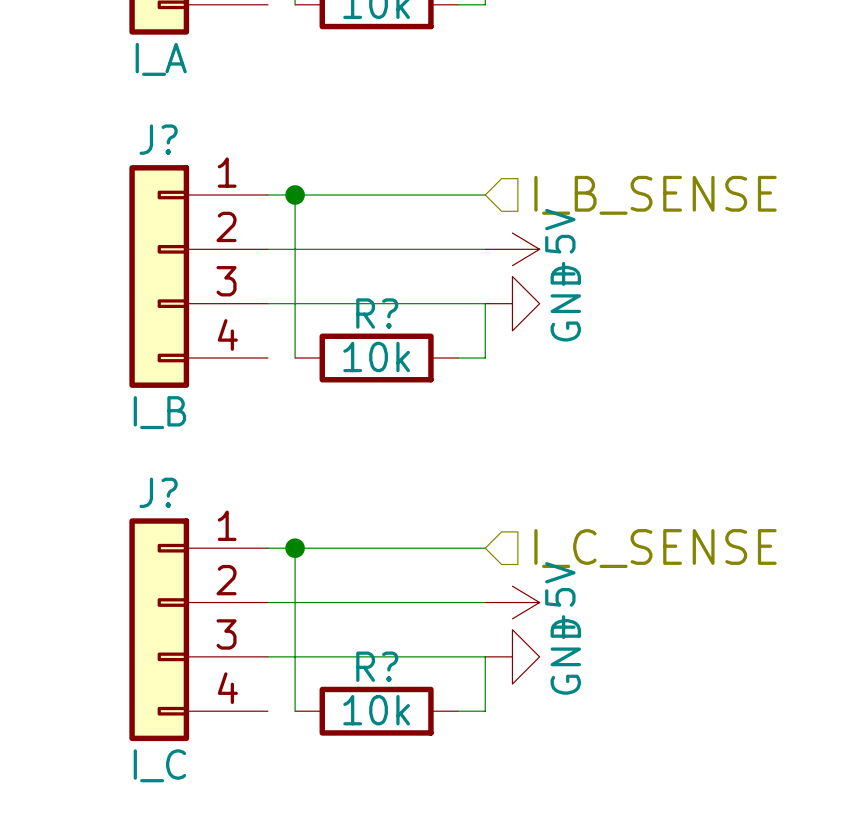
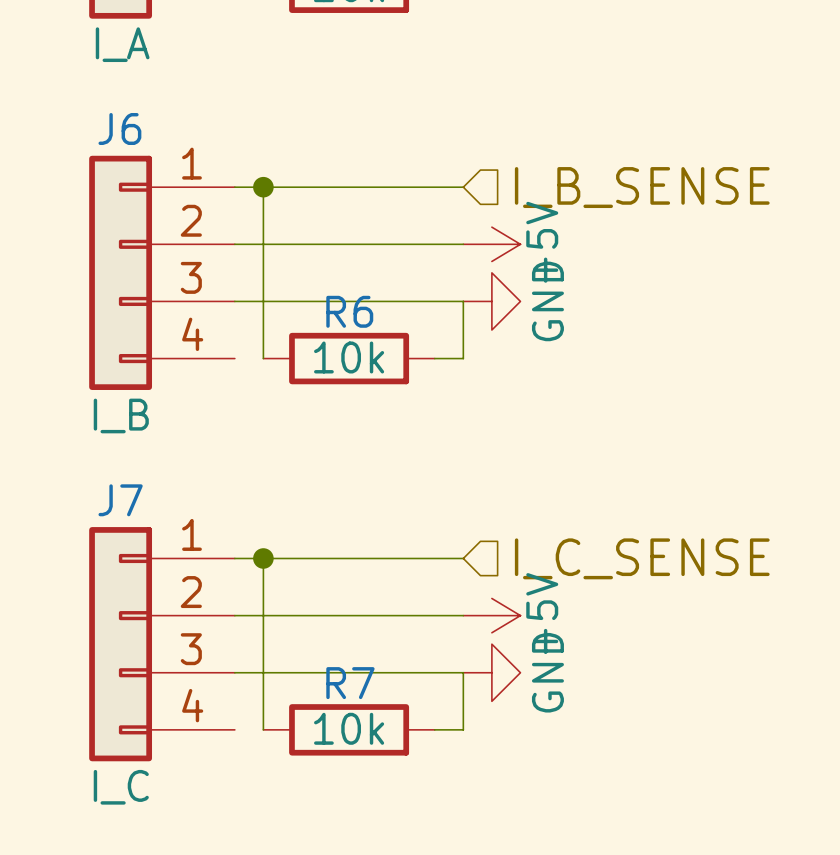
J? name: J? (158, 139) -> J6 (119, 129)
R? name: R? (377, 313) -> R6 (349, 311)
J? name: J? (158, 492) -> J7 (120, 500)
R? name: R? (377, 666) -> R7 (350, 683)

